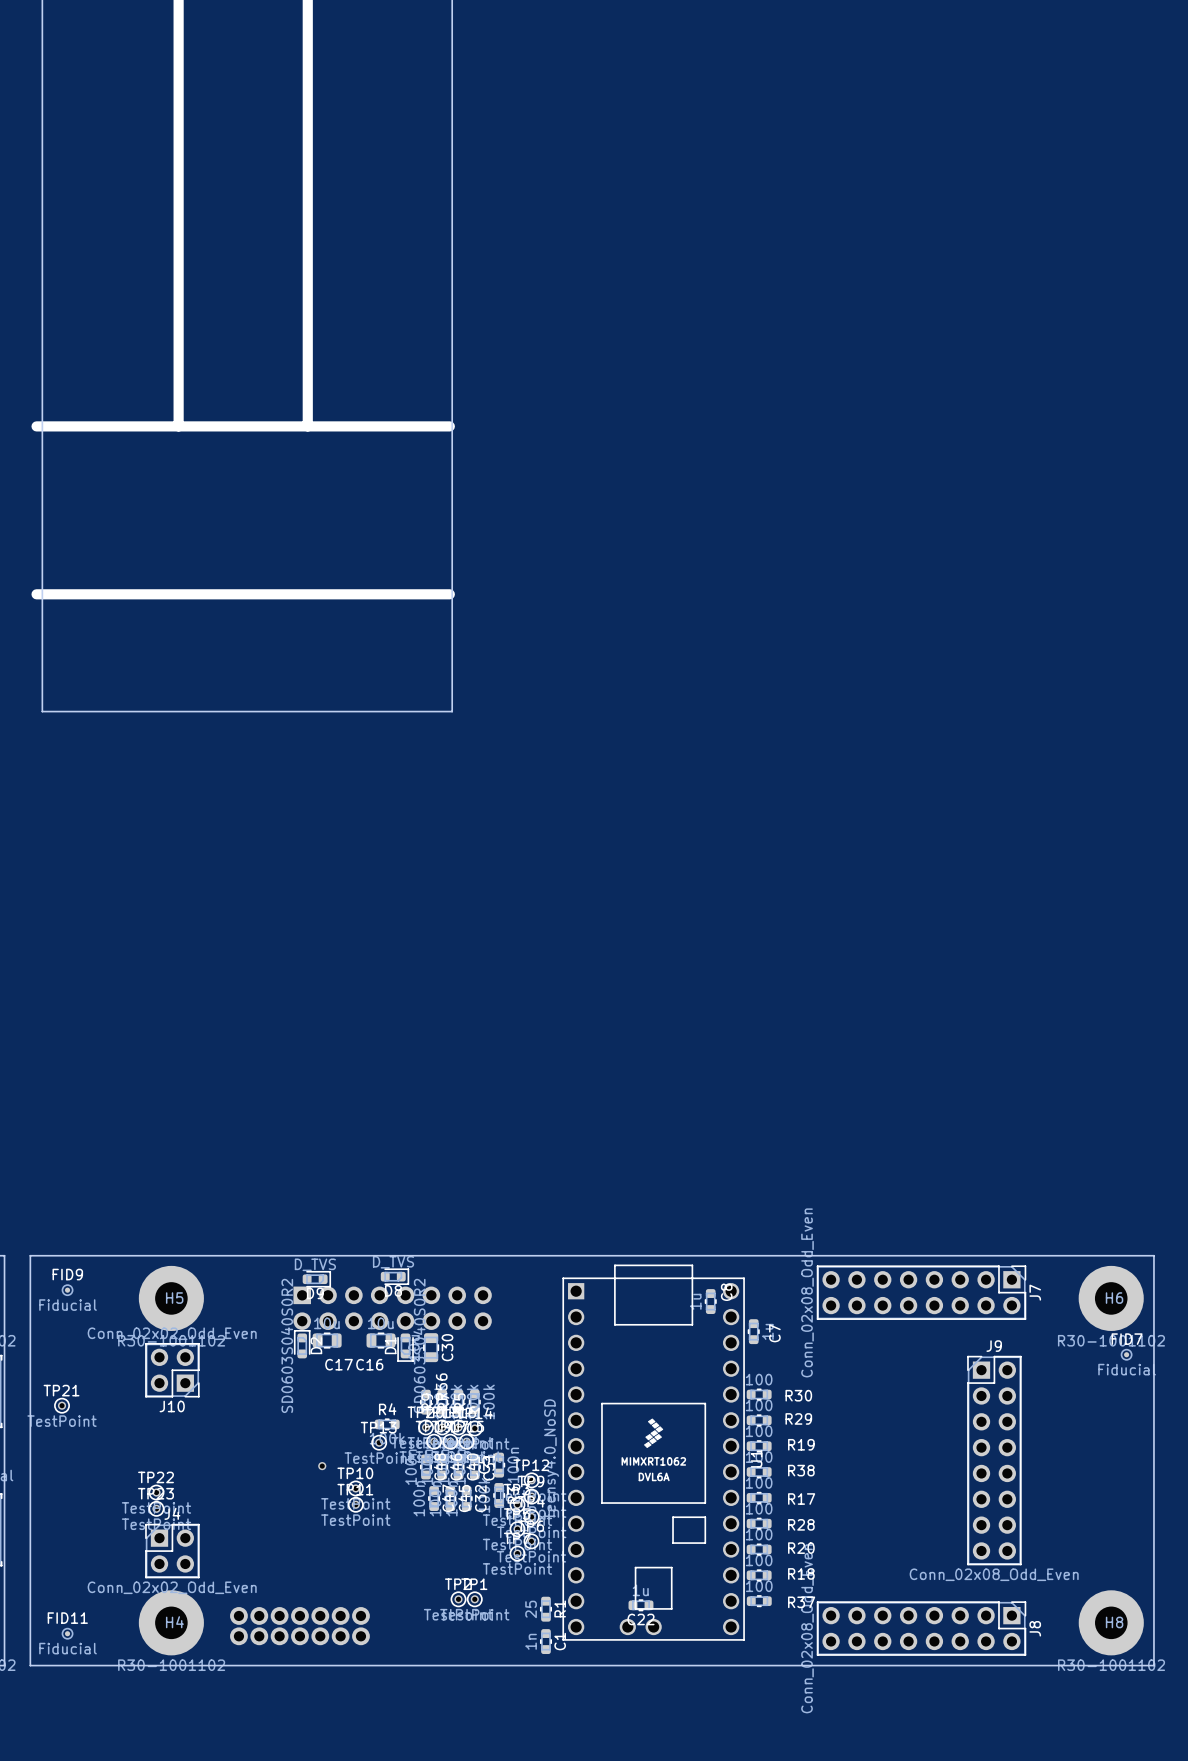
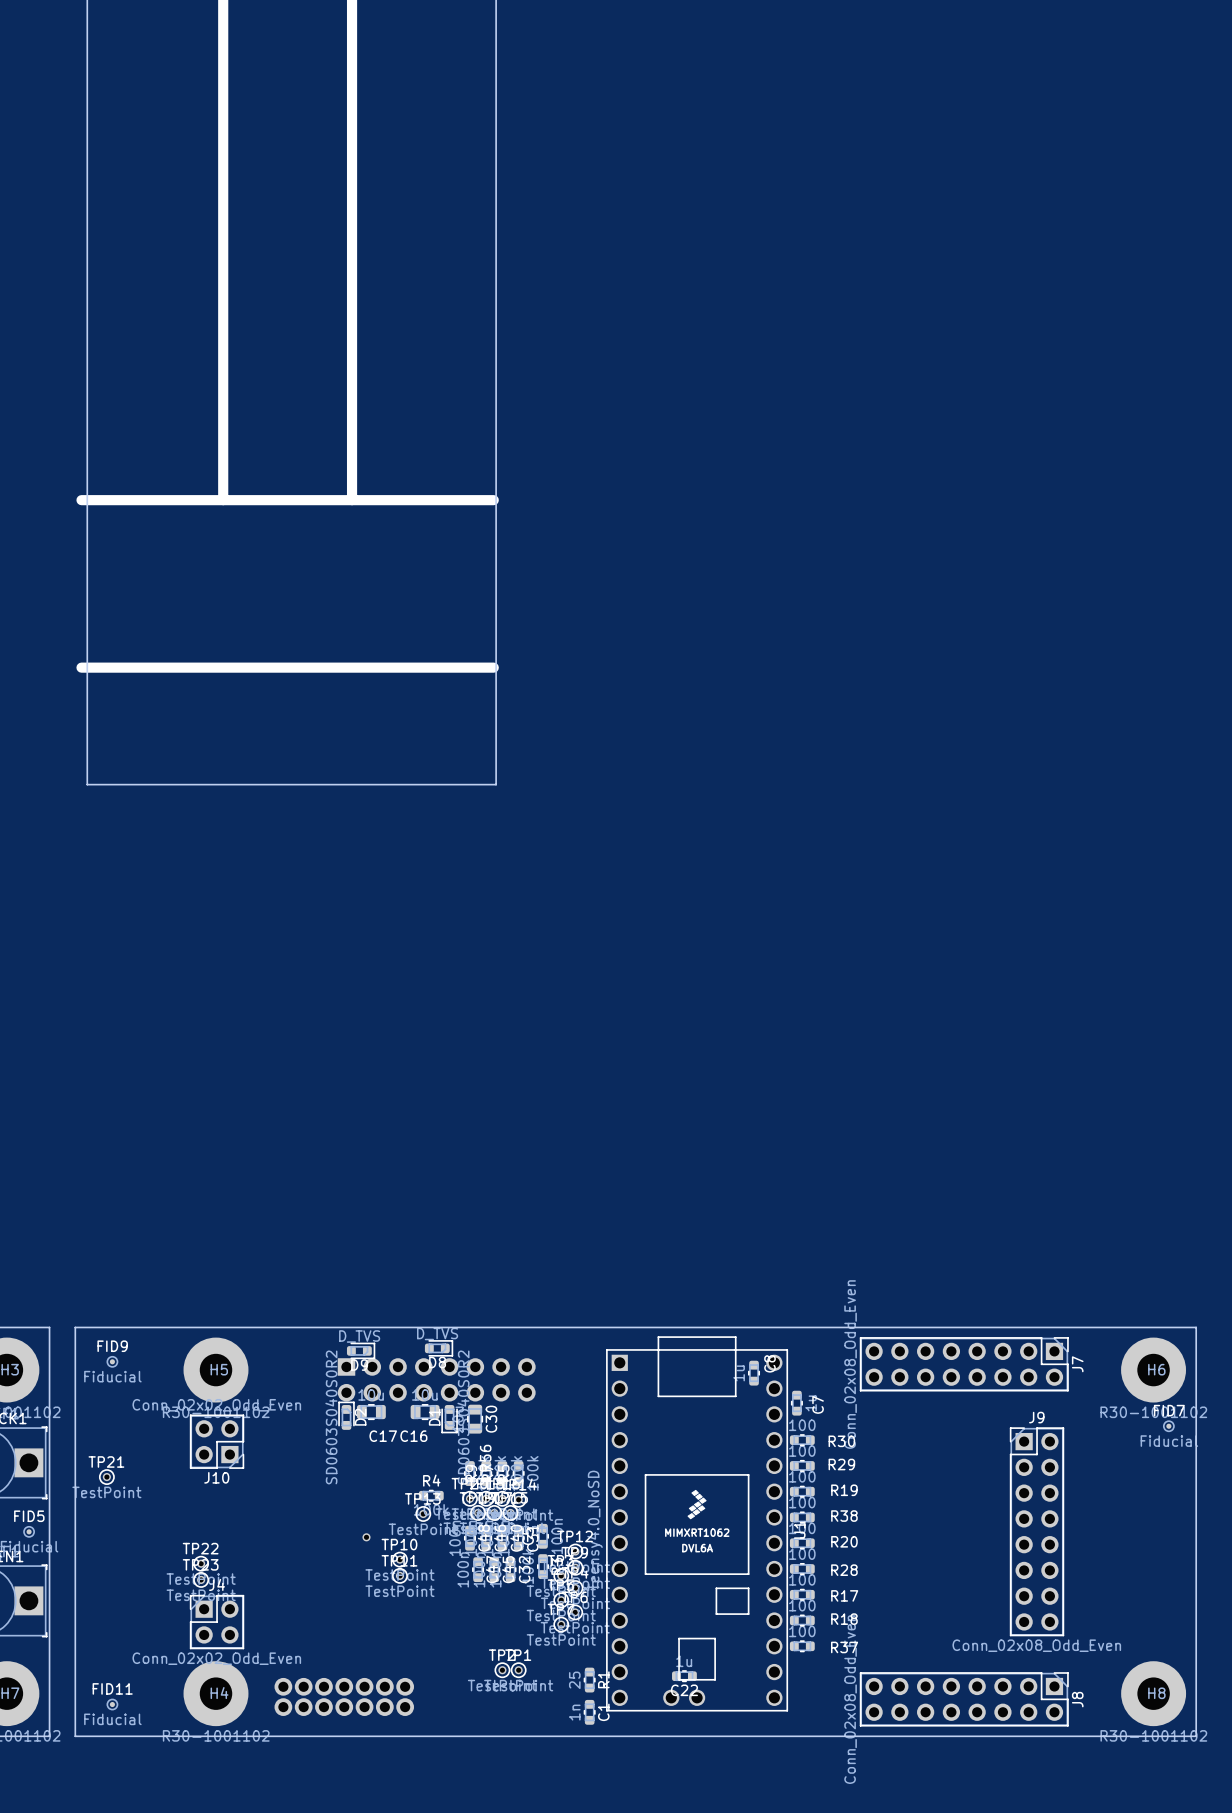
R30: none -> 100 (802, 1440)
R30 name: R30 (798, 1395) -> R29 (841, 1464)
R29 name: R29 (798, 1418) -> R19 (844, 1490)
R19 name: R19 (801, 1444) -> R38 (844, 1516)
R38 name: R38 (801, 1470) -> R20 (844, 1541)
R17 name: R17 (801, 1499) -> R28 (844, 1570)
R28 name: R28 (801, 1524) -> R17 (844, 1595)
R20 name: R20 (801, 1548) -> R18 (844, 1619)
R18 name: R18 (801, 1573) -> R37 (844, 1647)
R37: 100 (759, 1601) -> none

